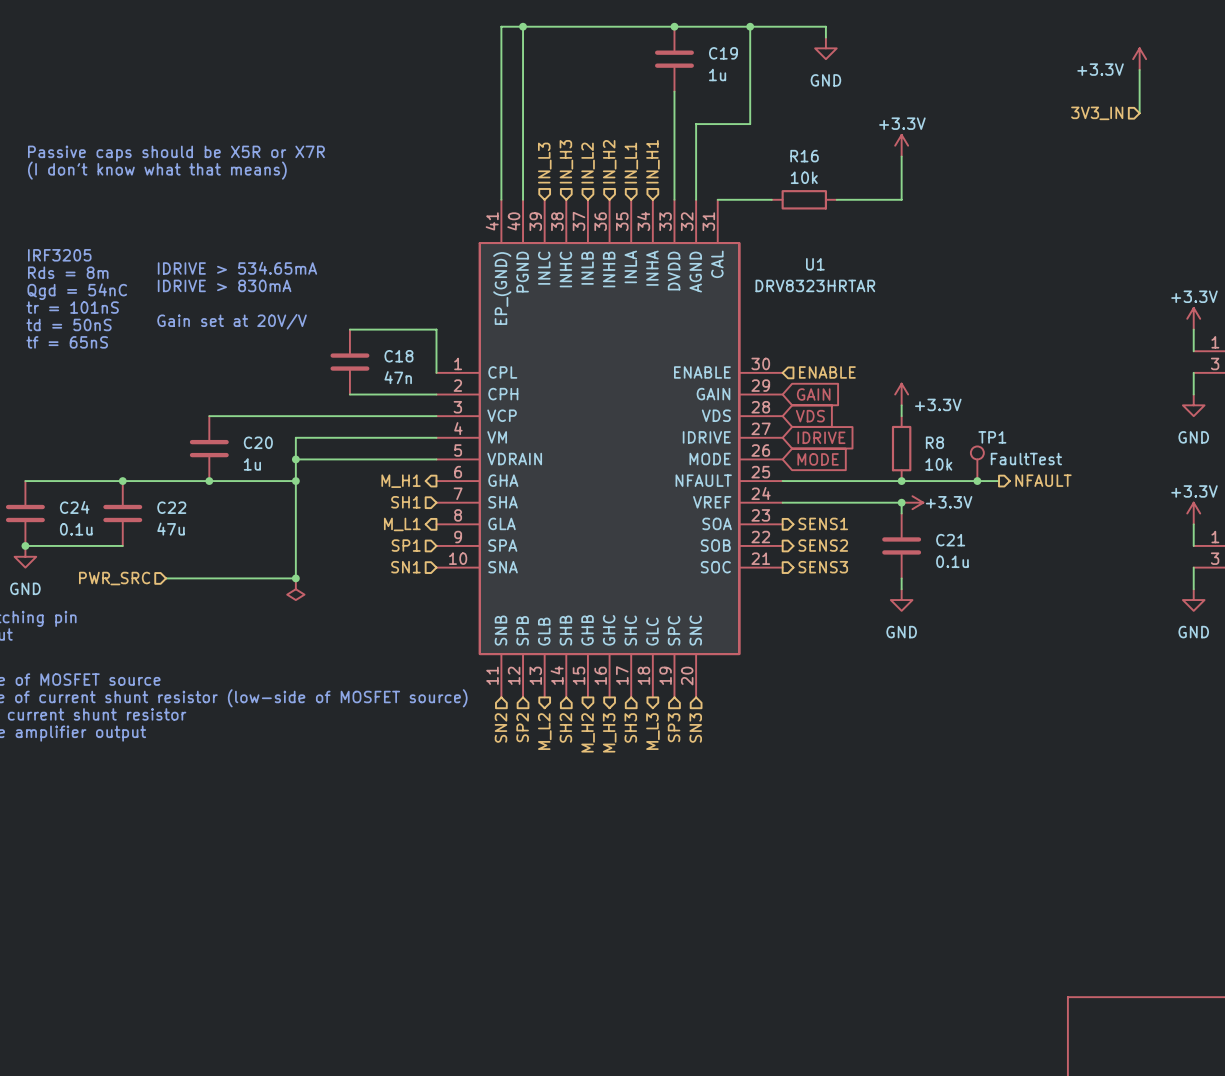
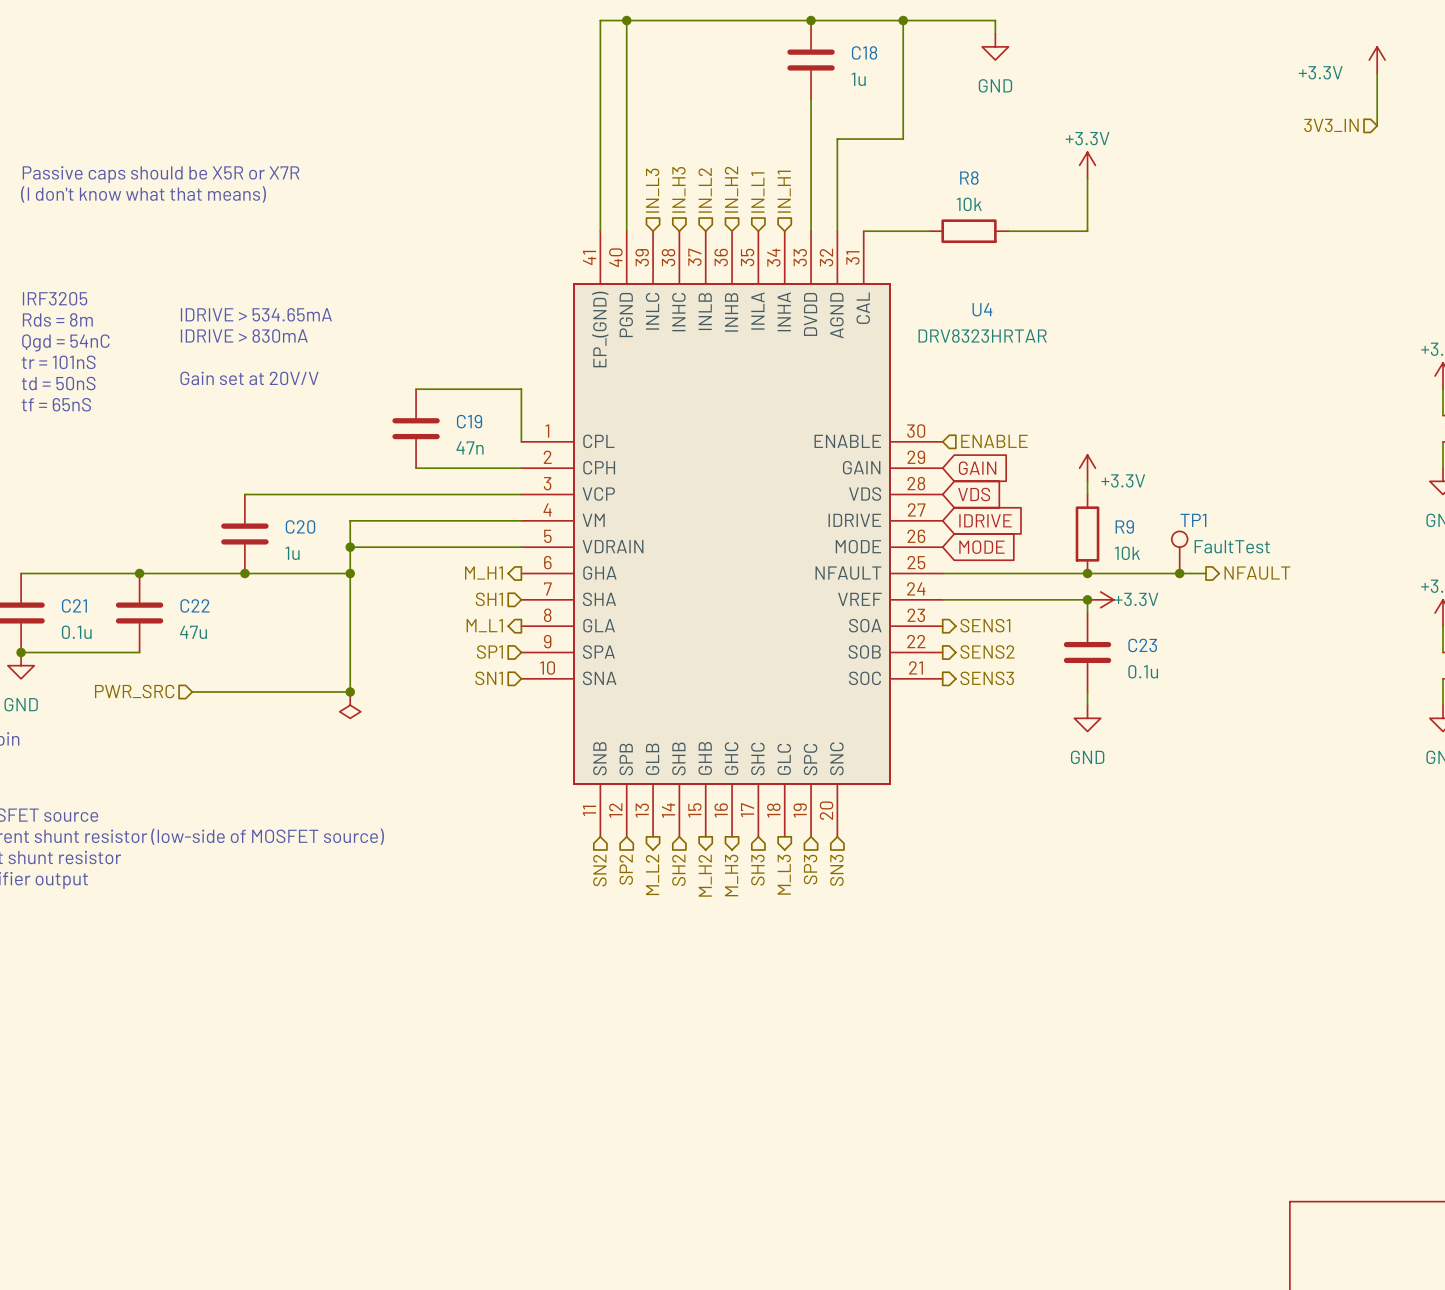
C19 name: C19 (723, 53) -> C18 (864, 52)
R16 name: R16 (804, 156) -> R8 (969, 178)
U1 name: U1 (815, 264) -> U4 (982, 309)
C18 name: C18 (398, 356) -> C19 (469, 421)
R8 name: R8 (934, 442) -> R9 (1124, 526)
C24 name: C24 (74, 507) -> C21 (74, 605)
C21 name: C21 (950, 540) -> C23 (1142, 645)

